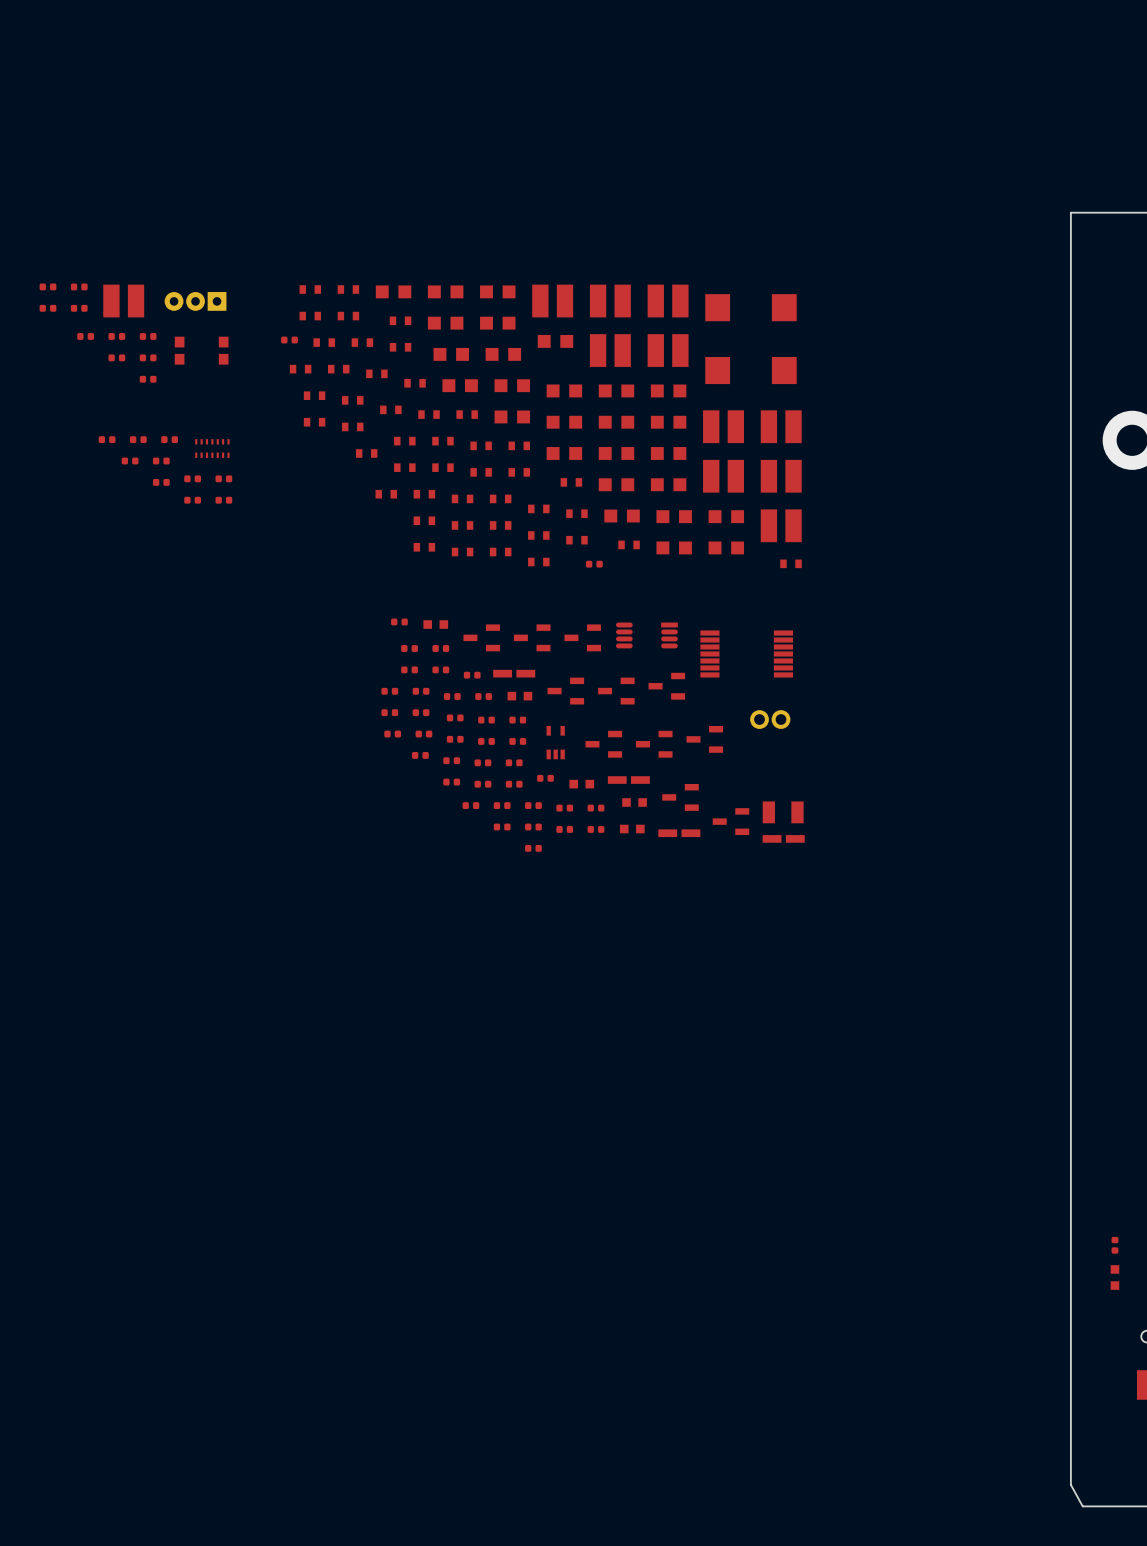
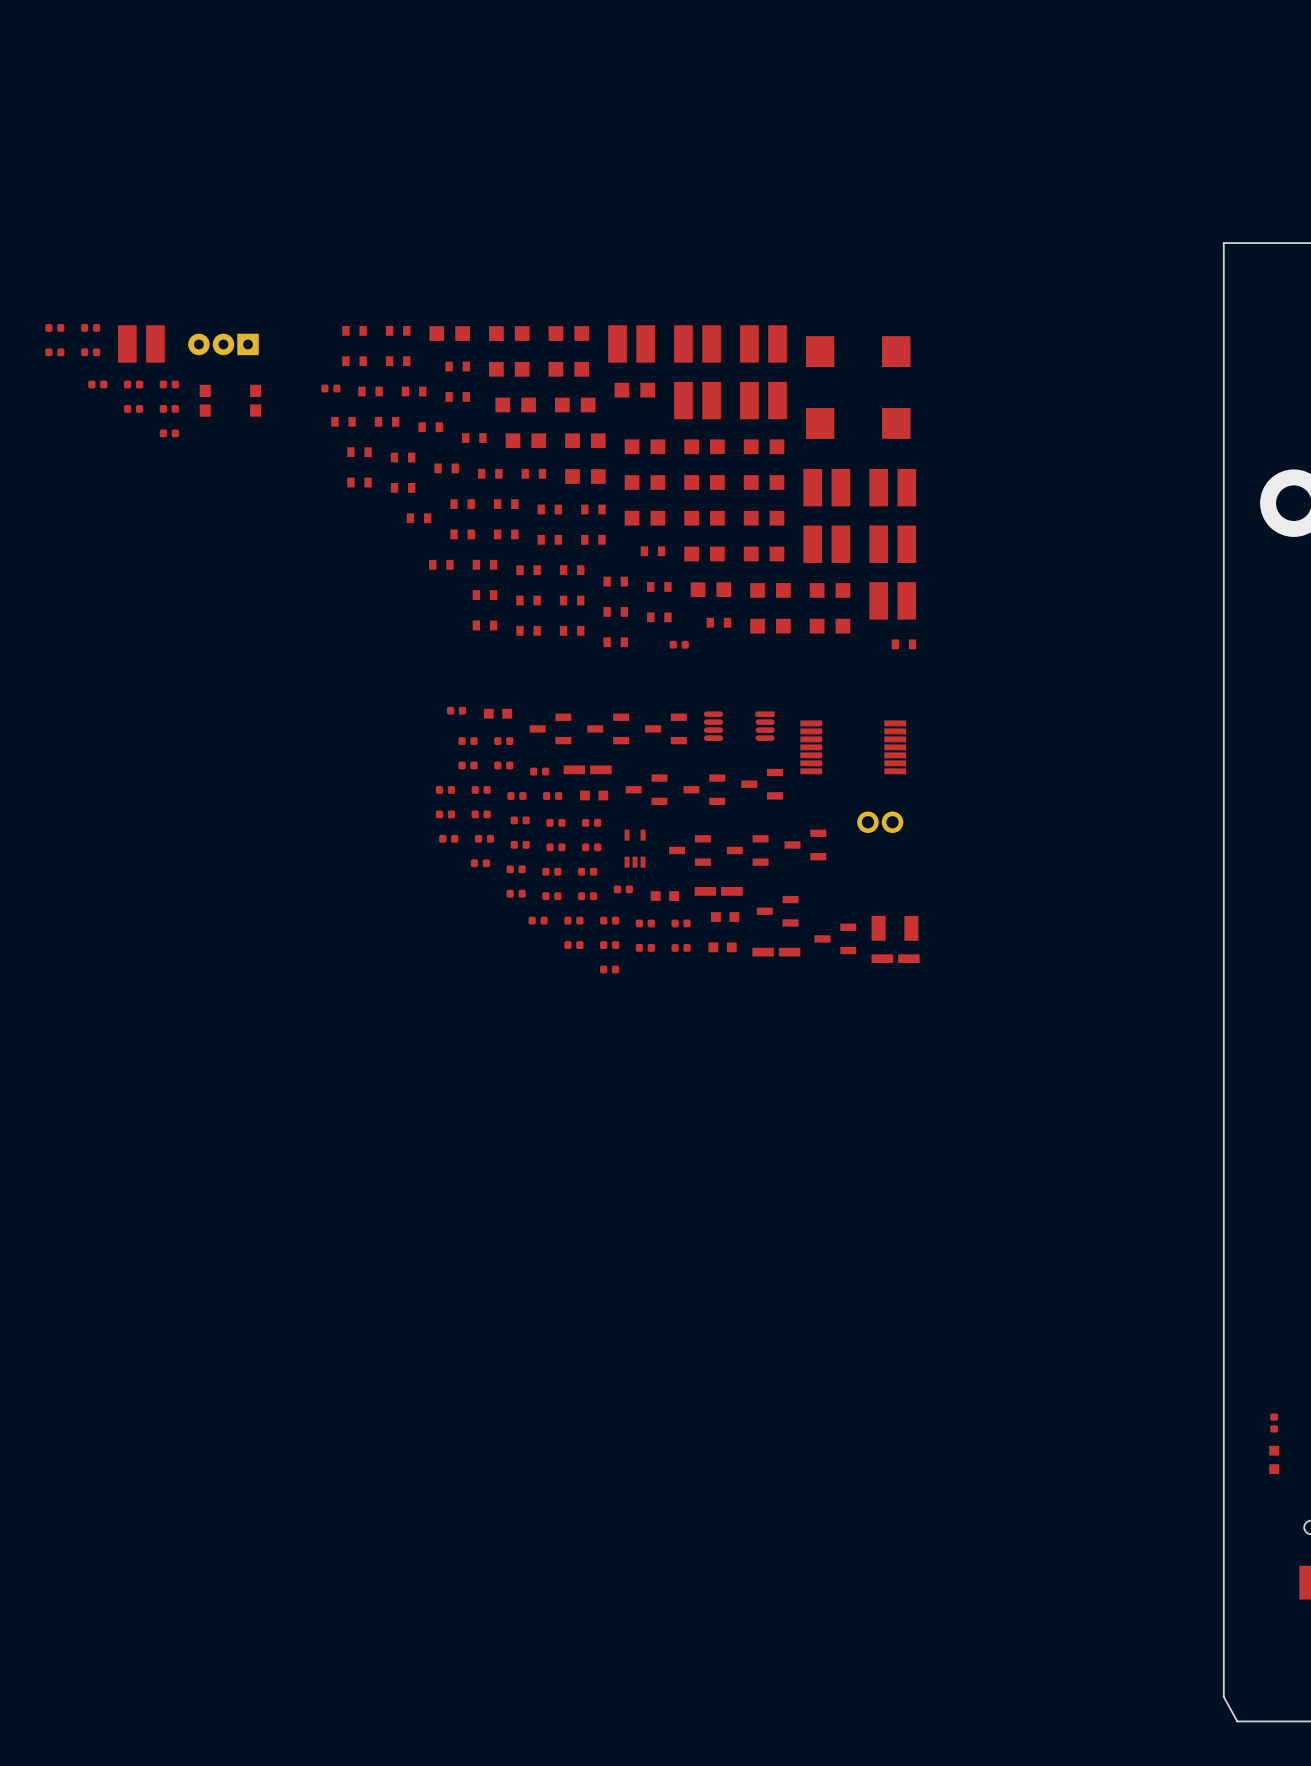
part: (107, 439) -> none
part: (138, 439) -> none
part: (169, 439) -> none
part: (212, 448) -> none
part: (130, 461) -> none
part: (161, 461) -> none
part: (192, 478) -> none
part: (223, 478) -> none
part: (161, 482) -> none
part: (192, 500) -> none
part: (223, 500) -> none

